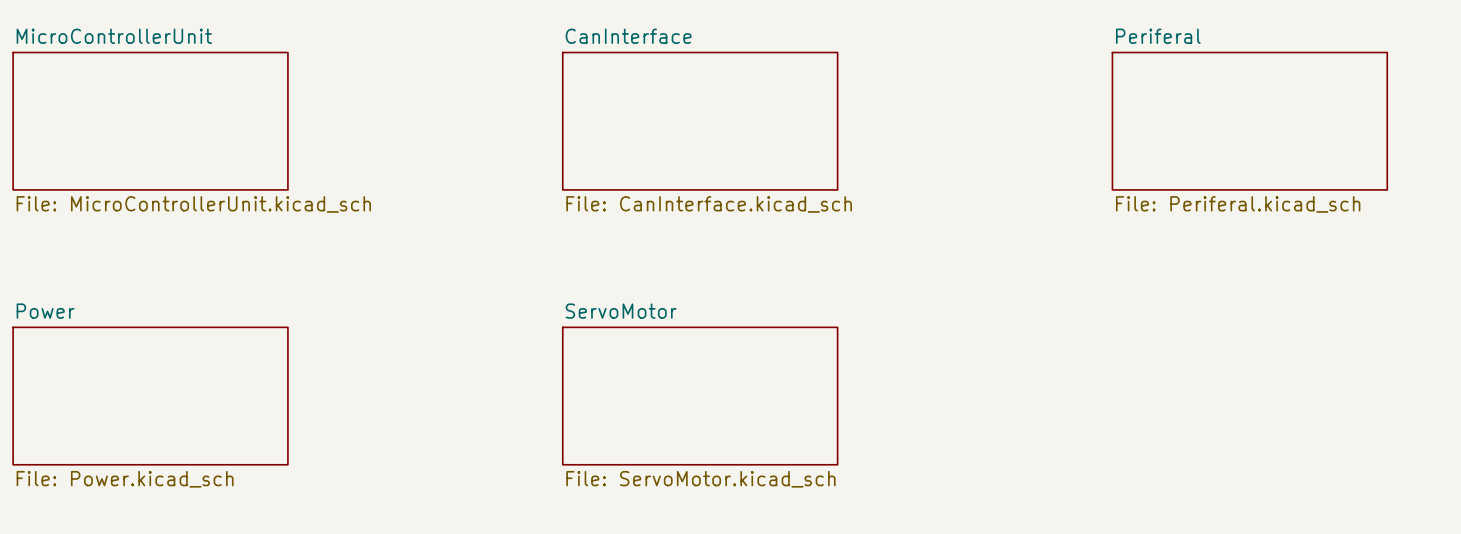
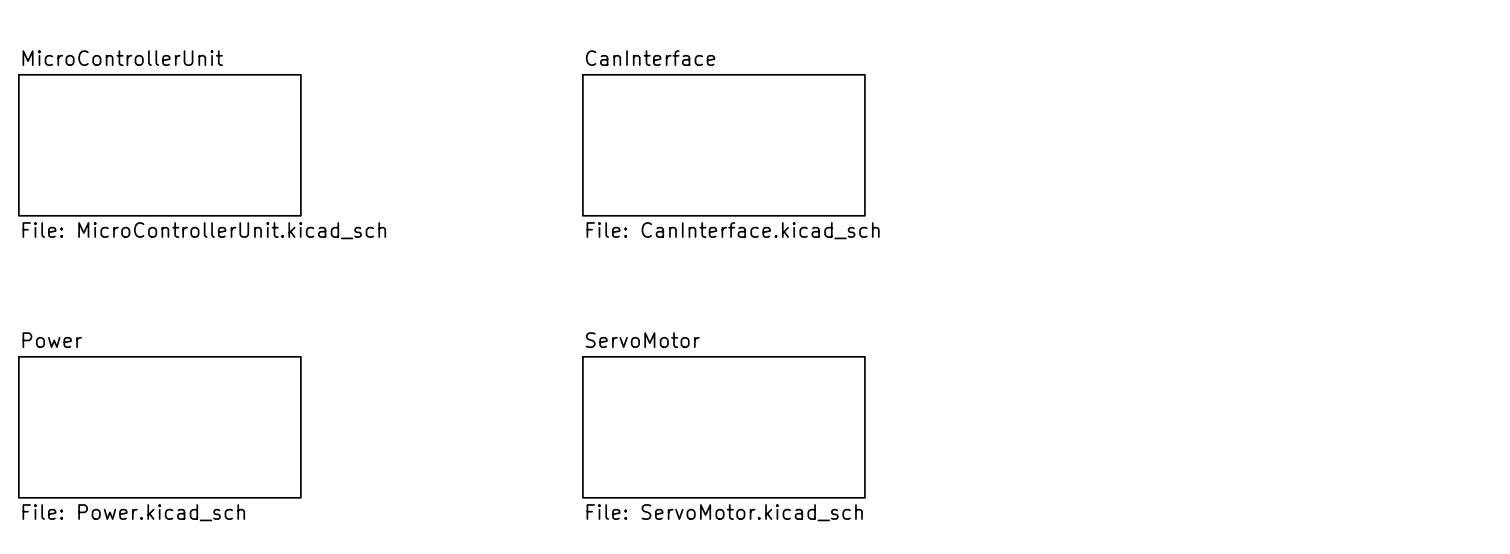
sheet Periferal: File: Periferal.kicad_sch (1249, 121) -> none

